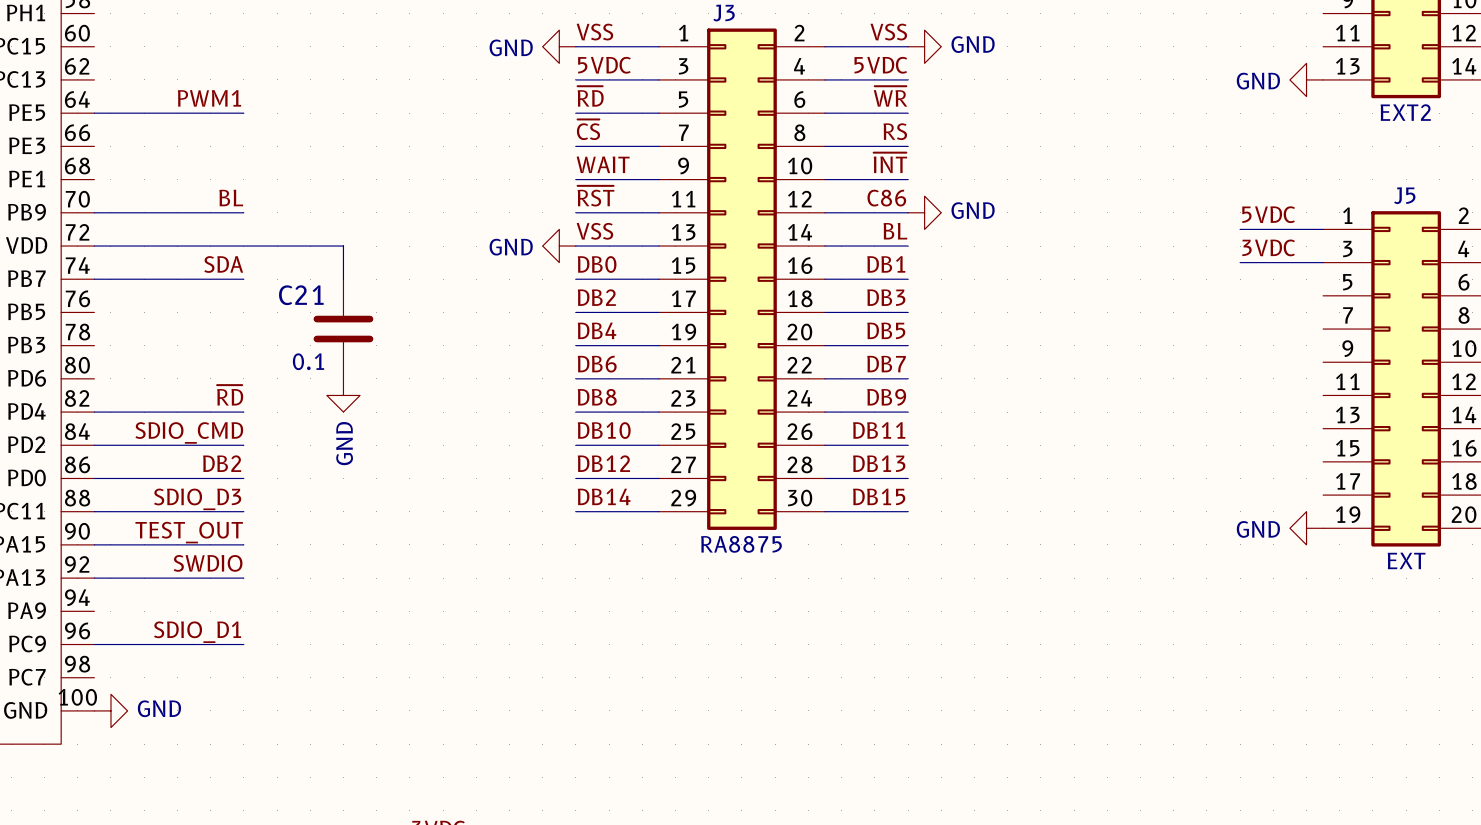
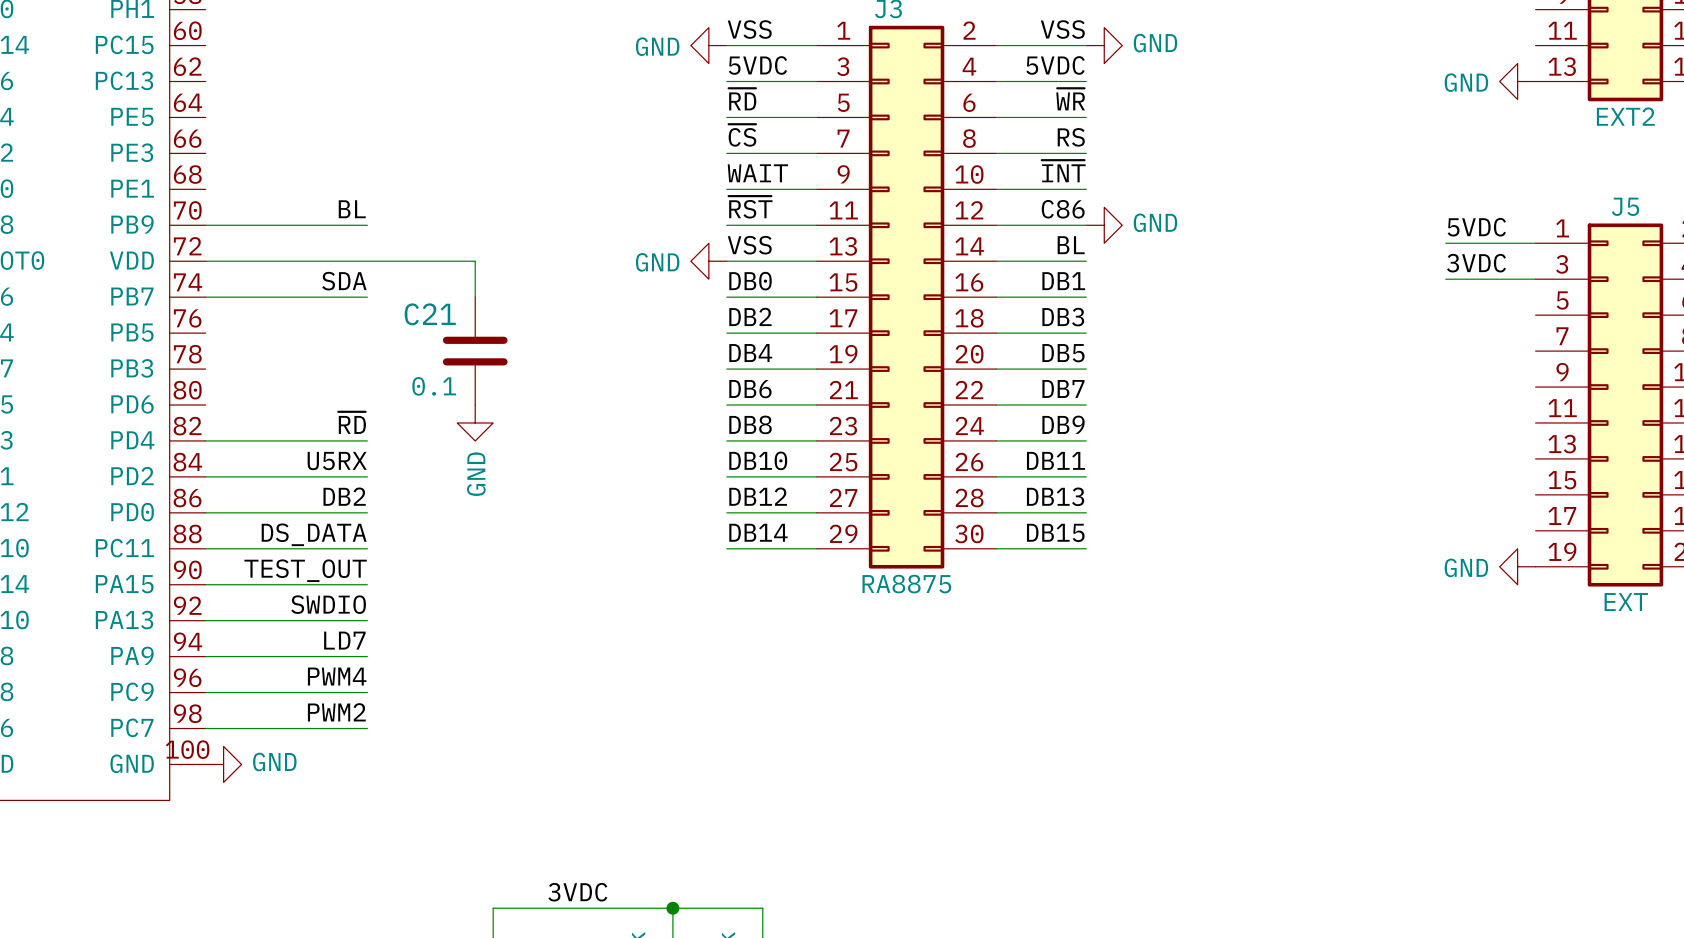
label: PWM1 (209, 98) -> none
wire: (94, 113) (243, 113) -> none
label: SDIO_CMD (189, 432) -> U5RX (337, 461)
label: SDIO_D3 (197, 499) -> DS_DATA (314, 534)
label: none -> LD7 (344, 640)
wire: none -> (205, 656) (367, 656)
label: SDIO_D1 (197, 632) -> PWM4 (337, 676)
label: none -> PWM2 (336, 712)
wire: none -> (205, 728) (367, 728)

